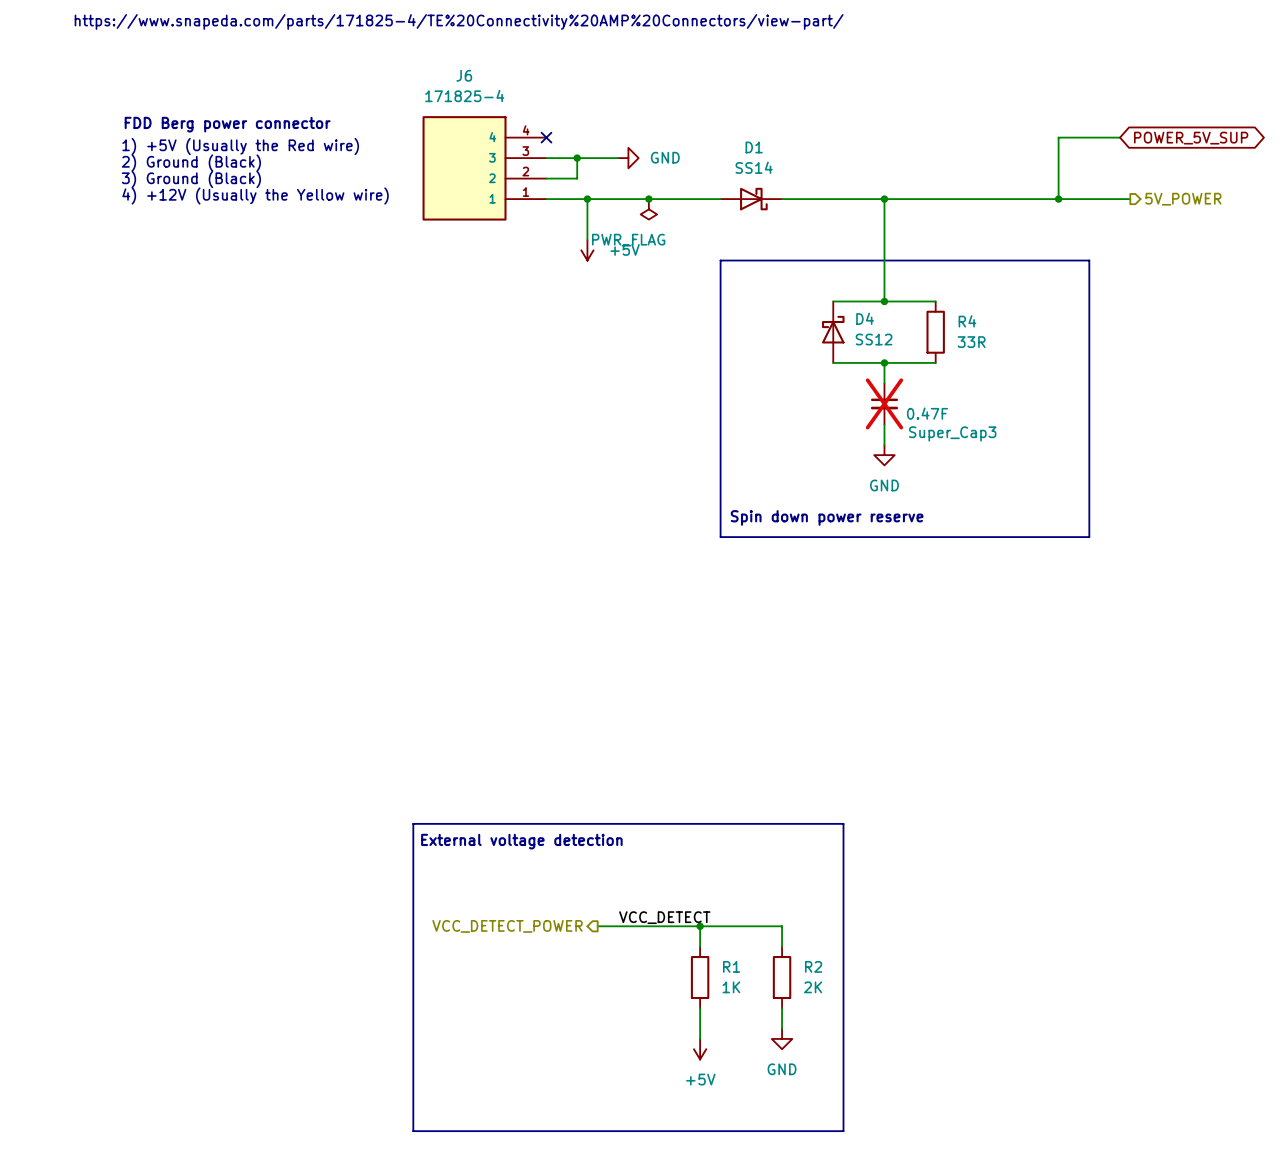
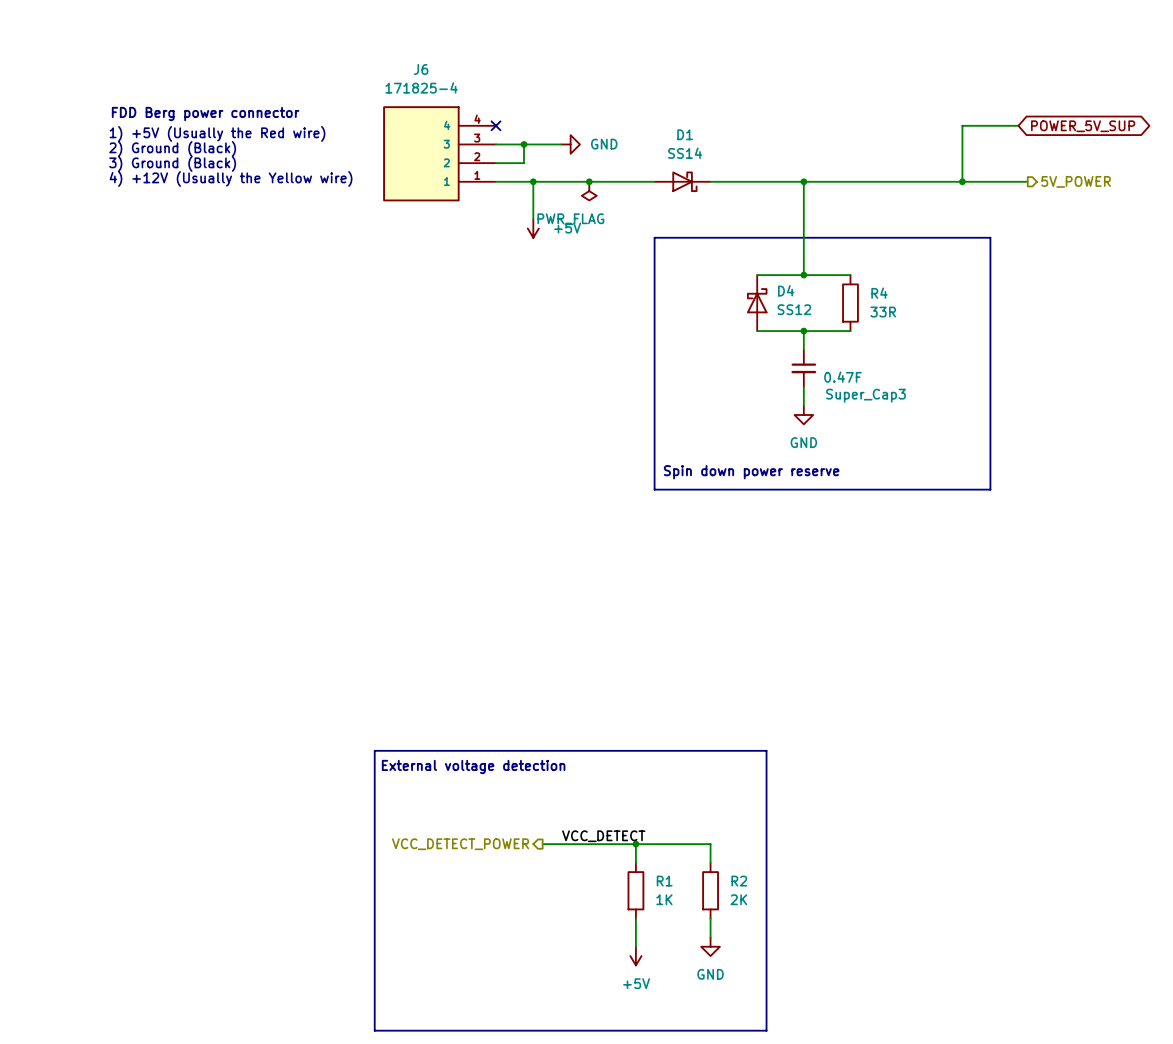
text: https://www.snapeda.com/parts/171825-4/TE%20Connectivity%20AMP%20Connectors/view-part/ (459, 21) -> none
Super_Cap3 do-not-place cross: (884, 403) -> none

